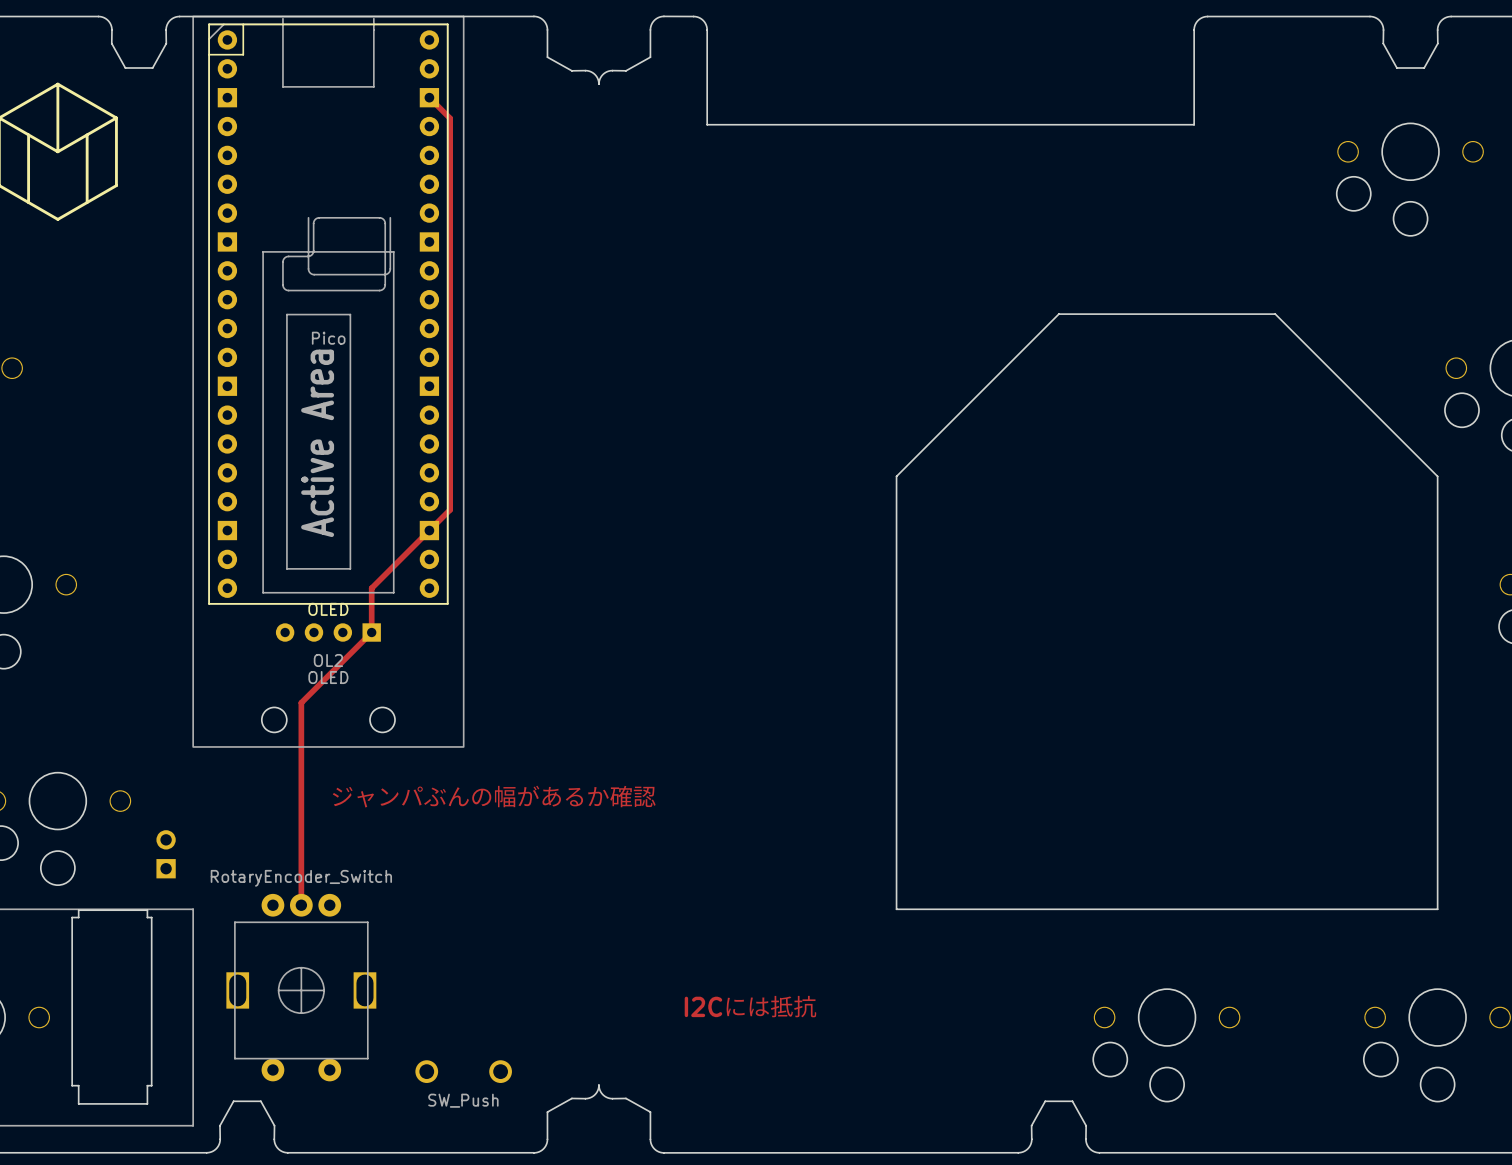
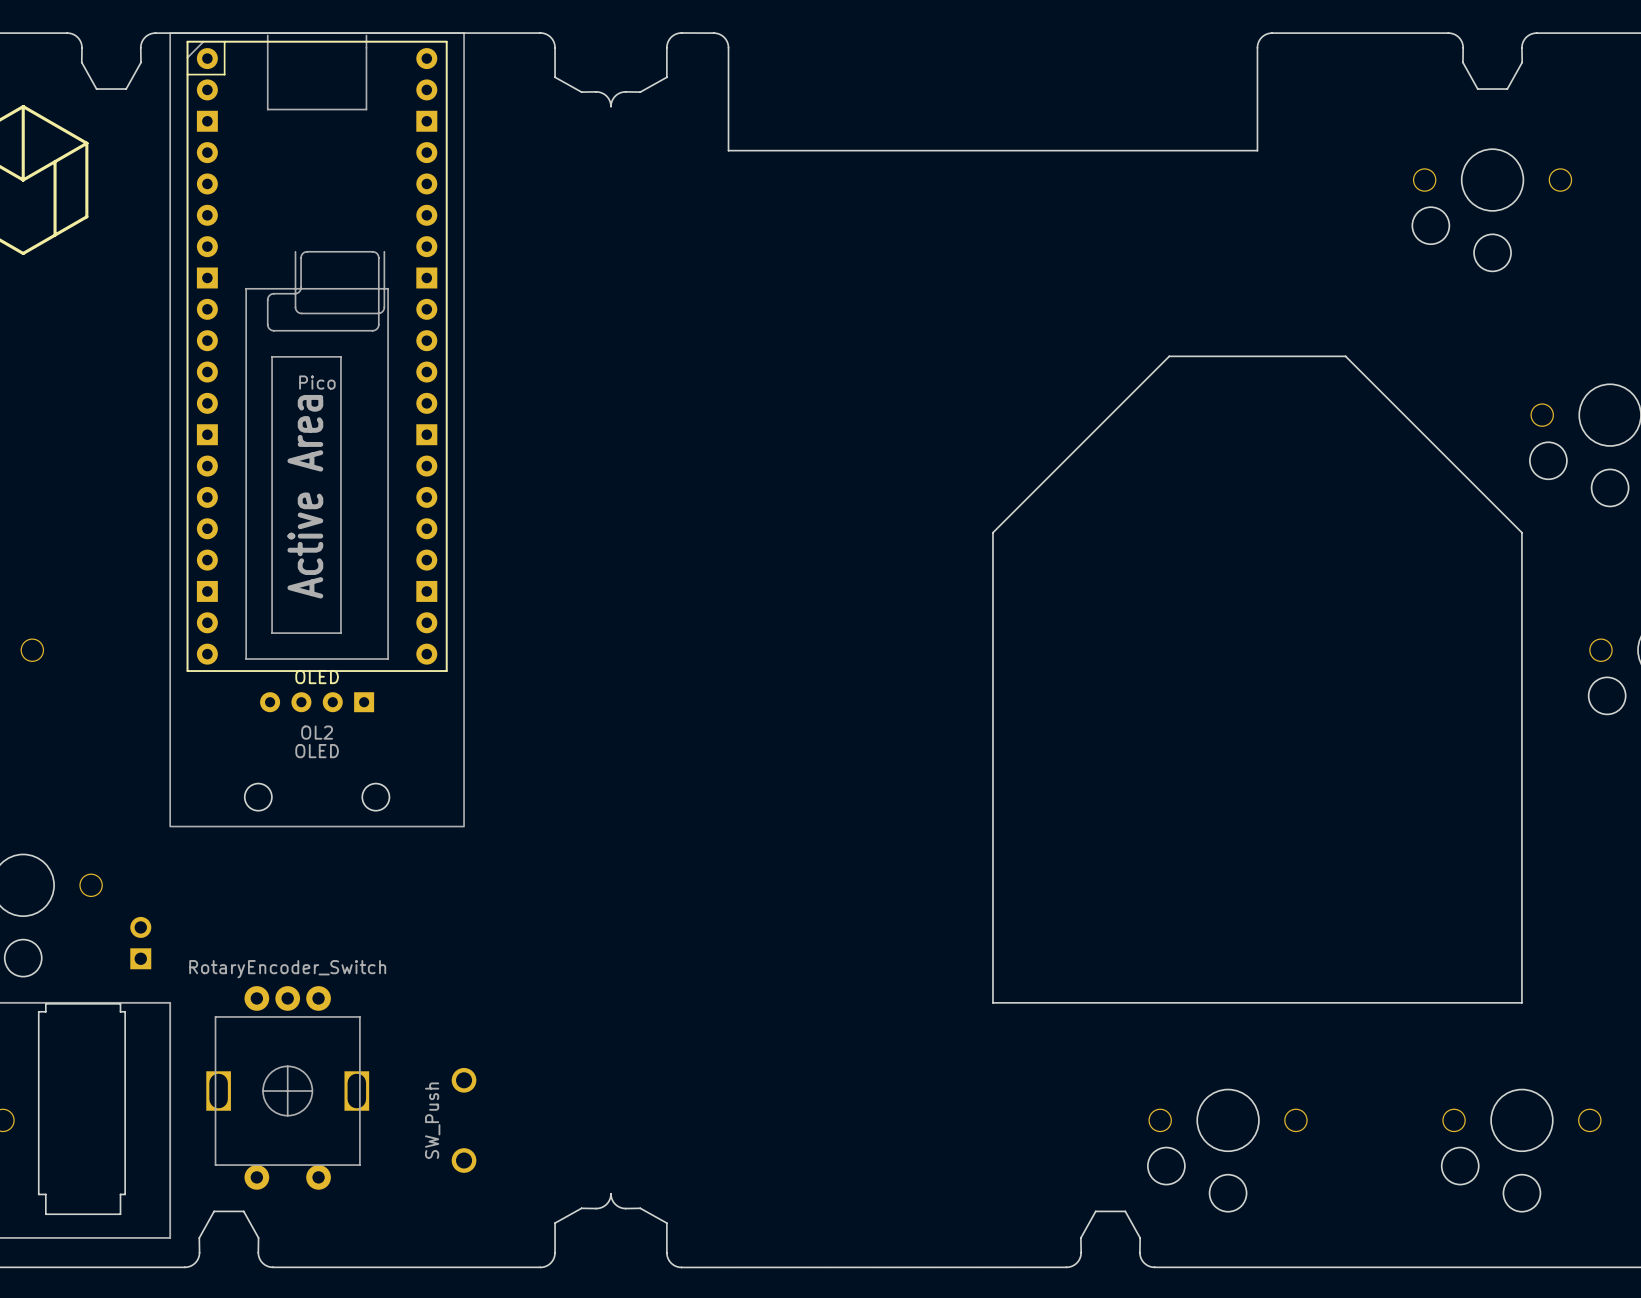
track: (429, 97) (450, 118) (450, 509) (371, 588) (371, 632) (301, 702) (301, 905) -> none
board edge: (1112, 314) (1058, 314) (896, 476) (896, 909) (950, 909) -> (1169, 356) (992, 532) (992, 1002)
text: ジャンパぶんの幅があるか確認 (494, 796) -> none
text: I2Cには抵抗 (751, 1006) -> none
part rotation: 0° (463, 1071) -> 90° clockwise (464, 1120)

